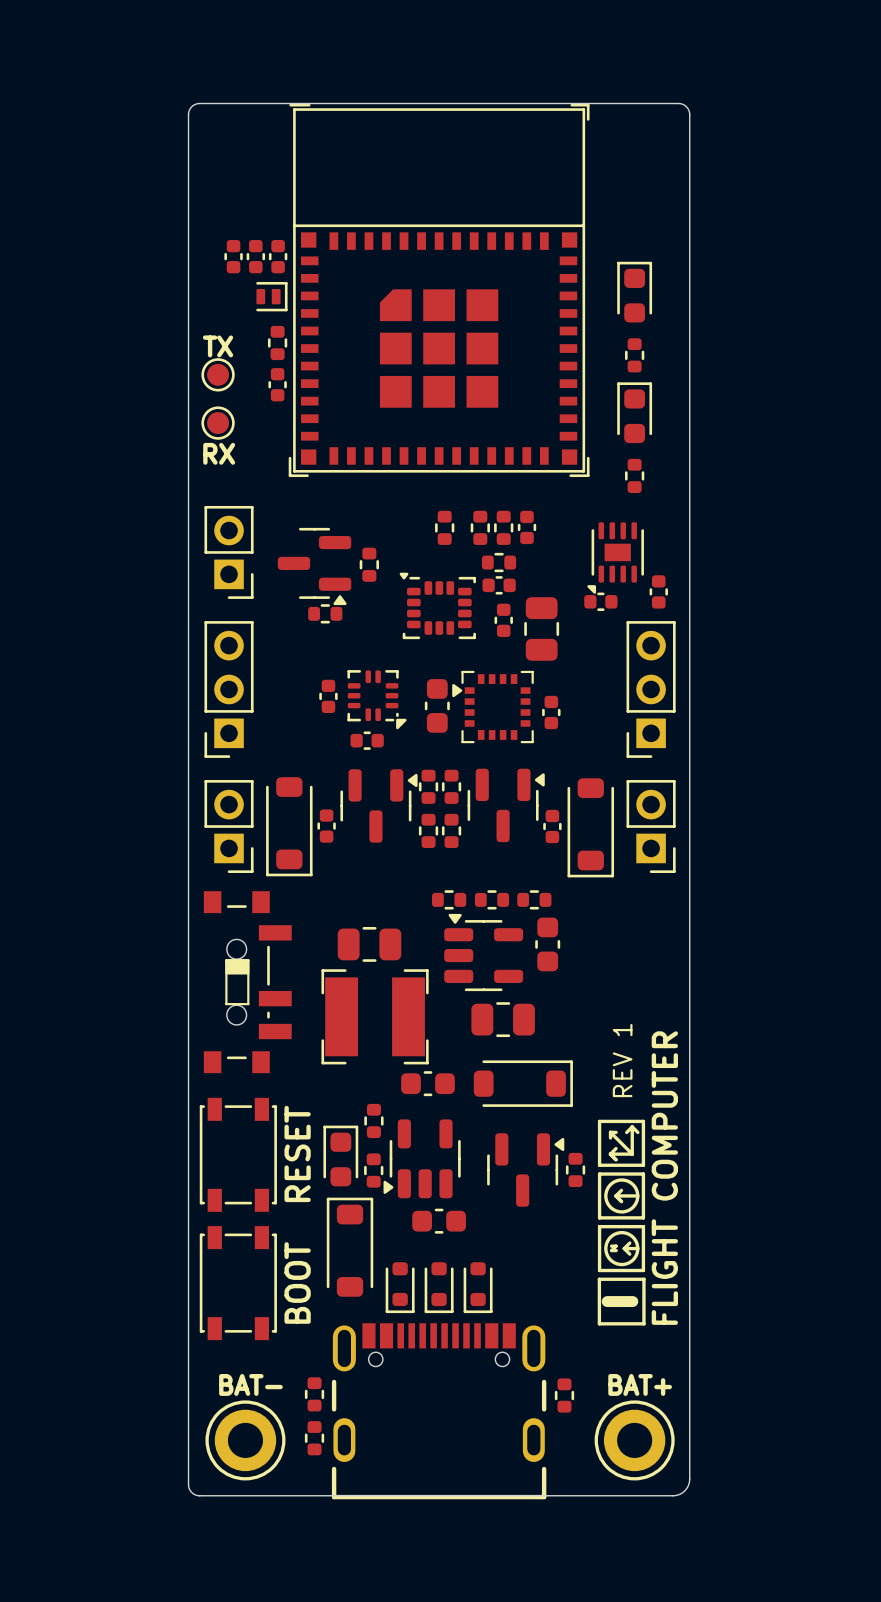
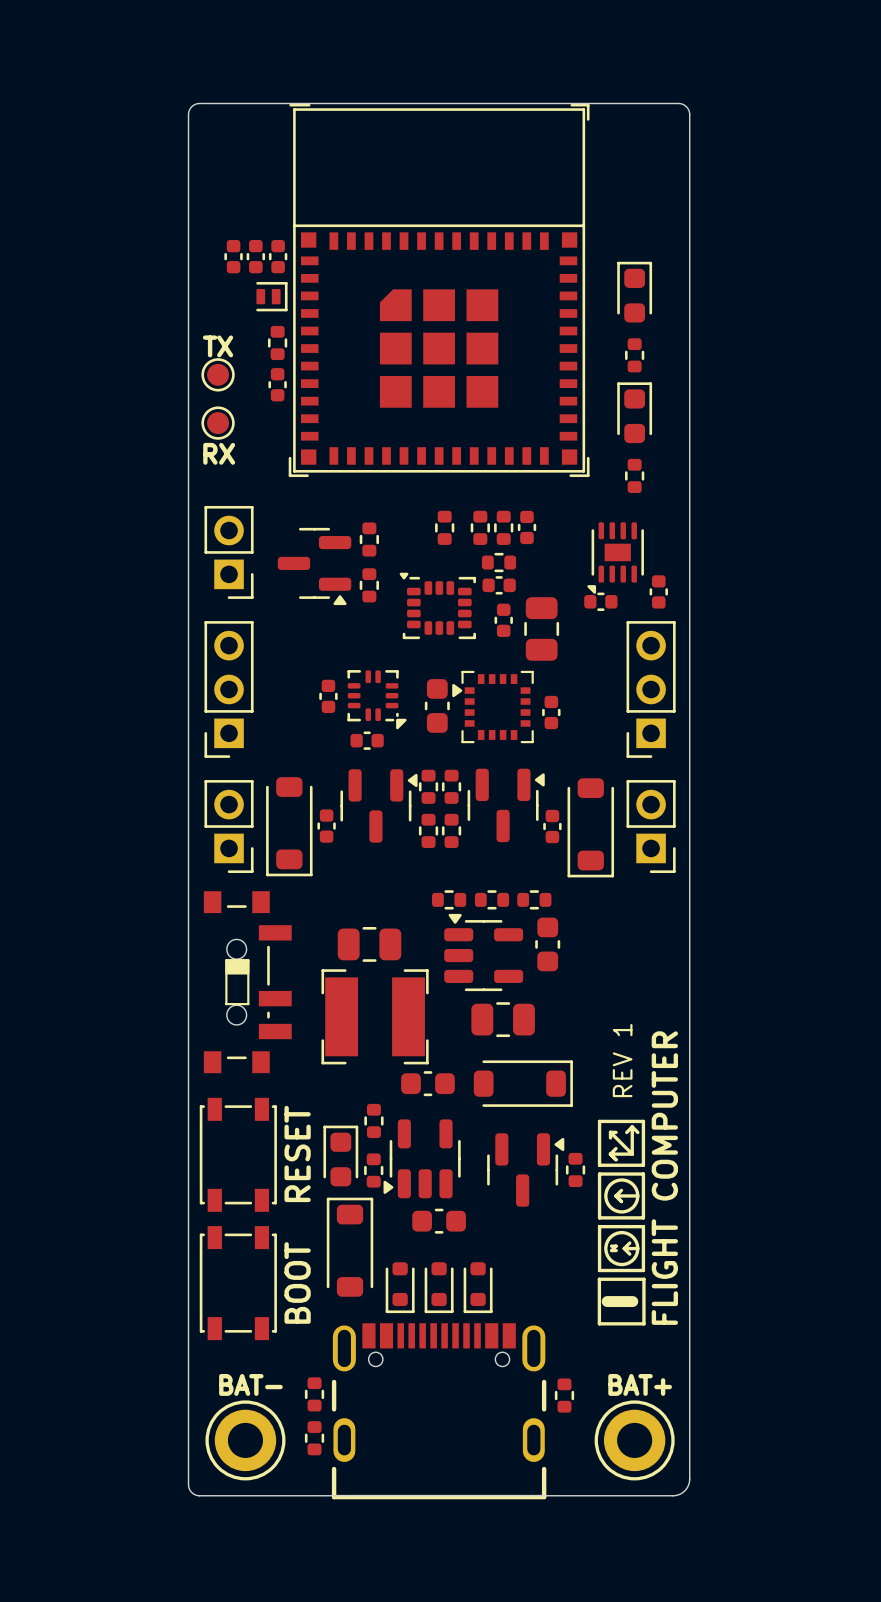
part: none -> (369, 539)
part: (369, 564) -> none
part: none -> (369, 585)
part: (325, 613) -> none

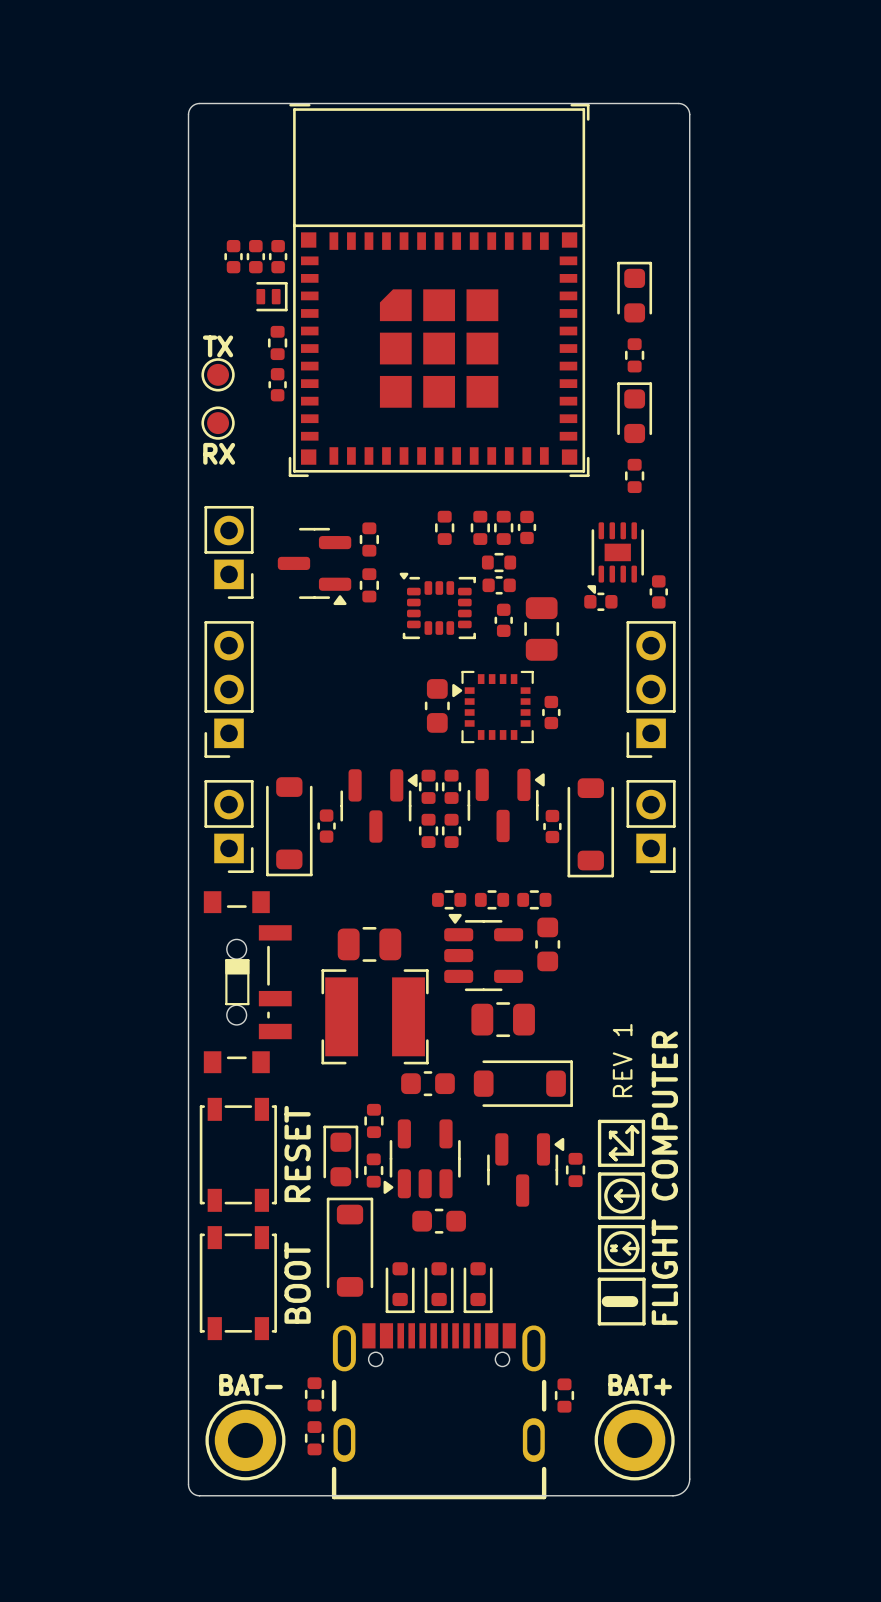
part: (328, 696) -> none
part: (377, 699) -> none
part: (367, 740) -> none

